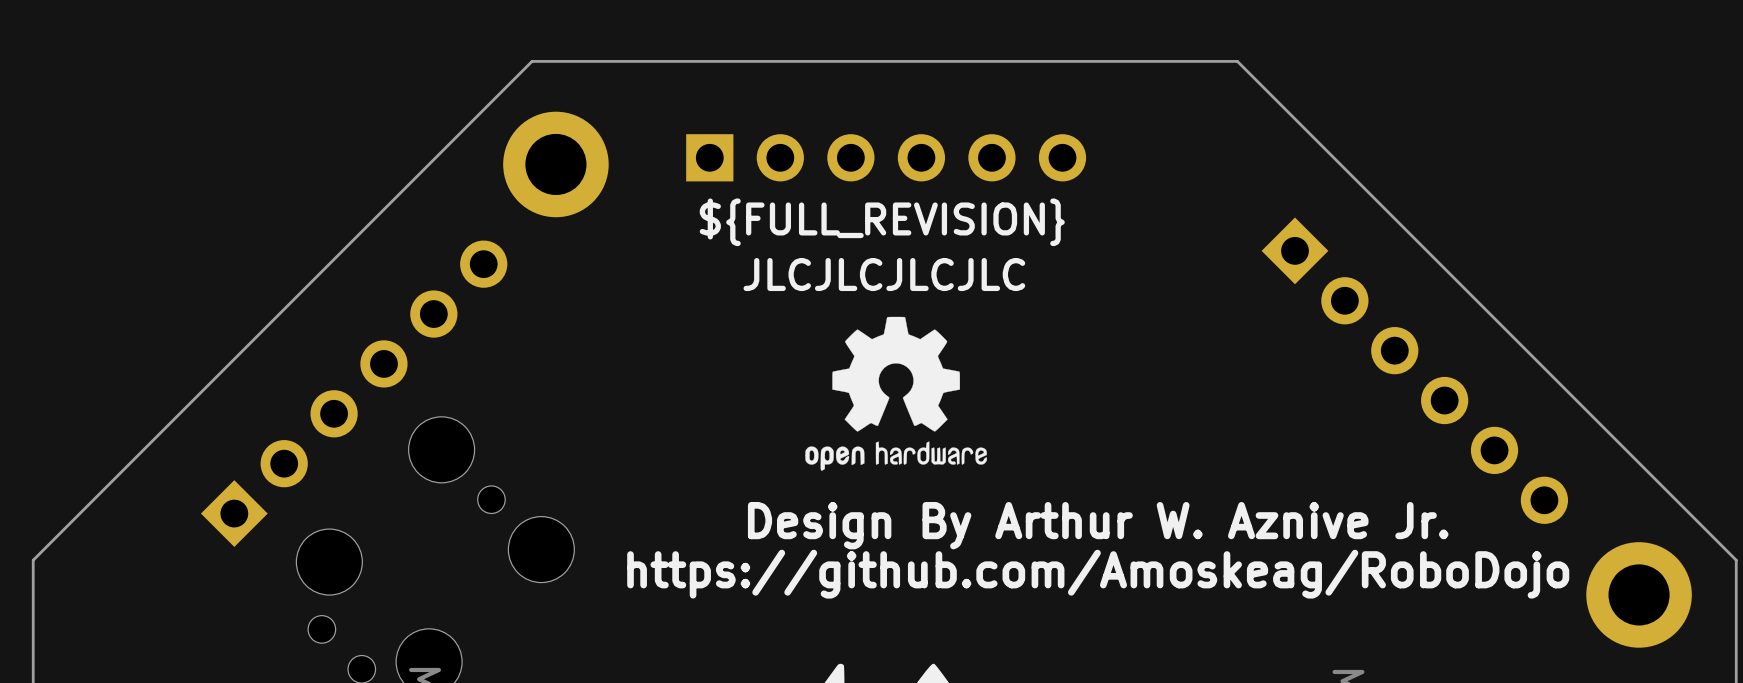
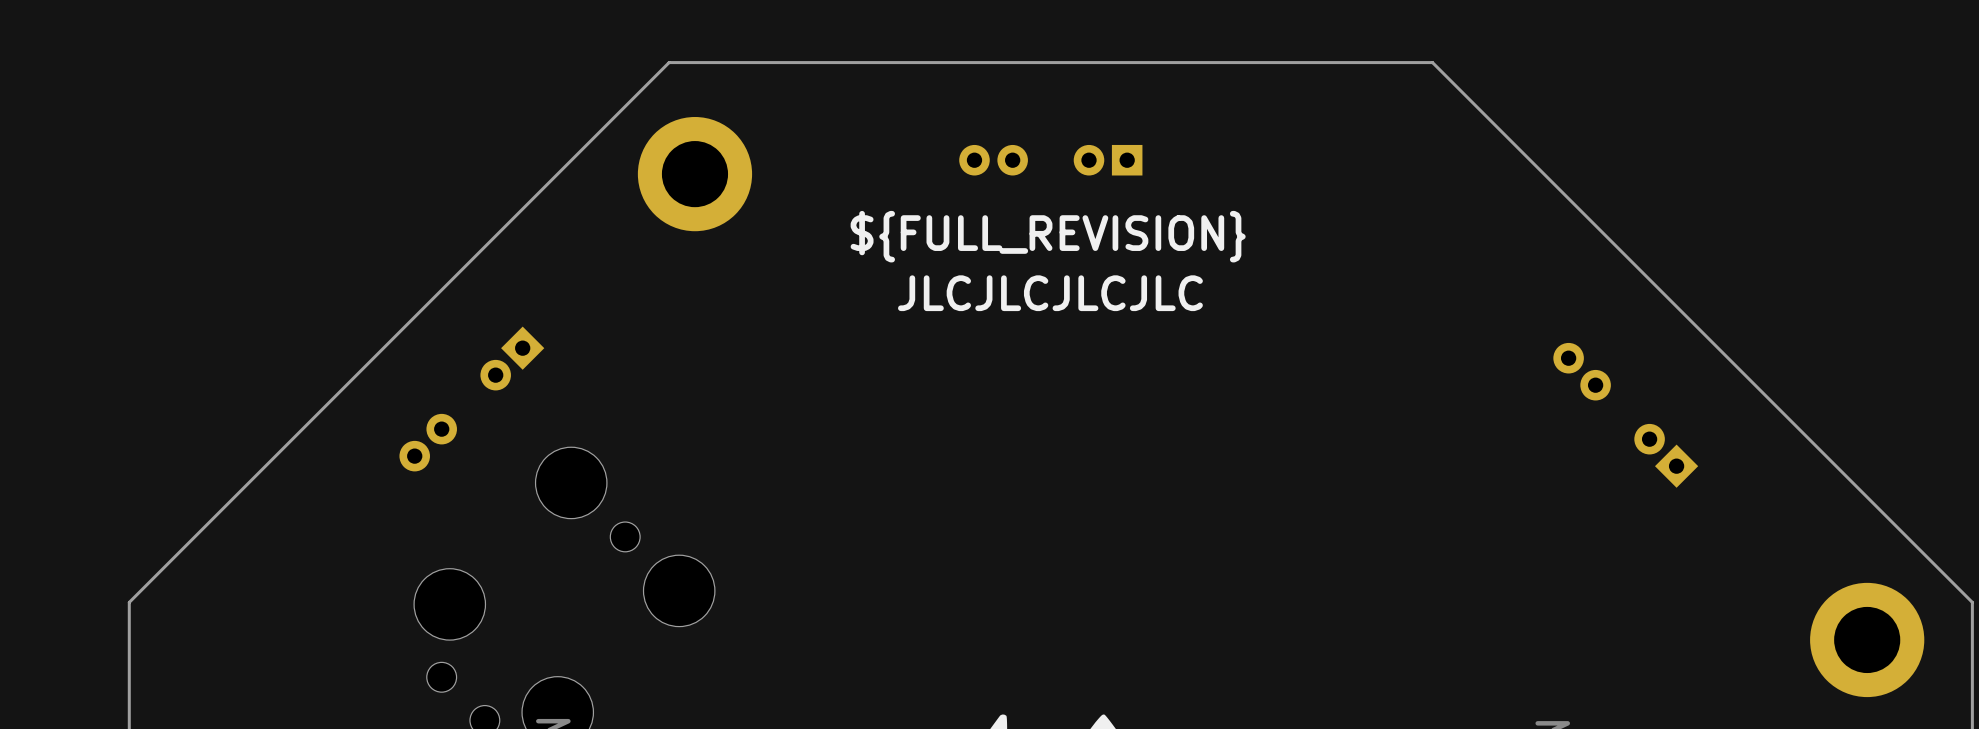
part footprint: [686, 134, 1087, 182] -> [959, 144, 1143, 176]
part footprint: [1261, 217, 1569, 524] -> [1553, 342, 1699, 488]
part footprint: [200, 240, 508, 547] -> [399, 326, 545, 472]
drawing: [805, 316, 987, 471] -> none
text: Design By Arthur W. Aznive Jr. (1098, 525) -> none
text: https://github.com/Amoskeag/RoboDojo (1098, 574) -> none

